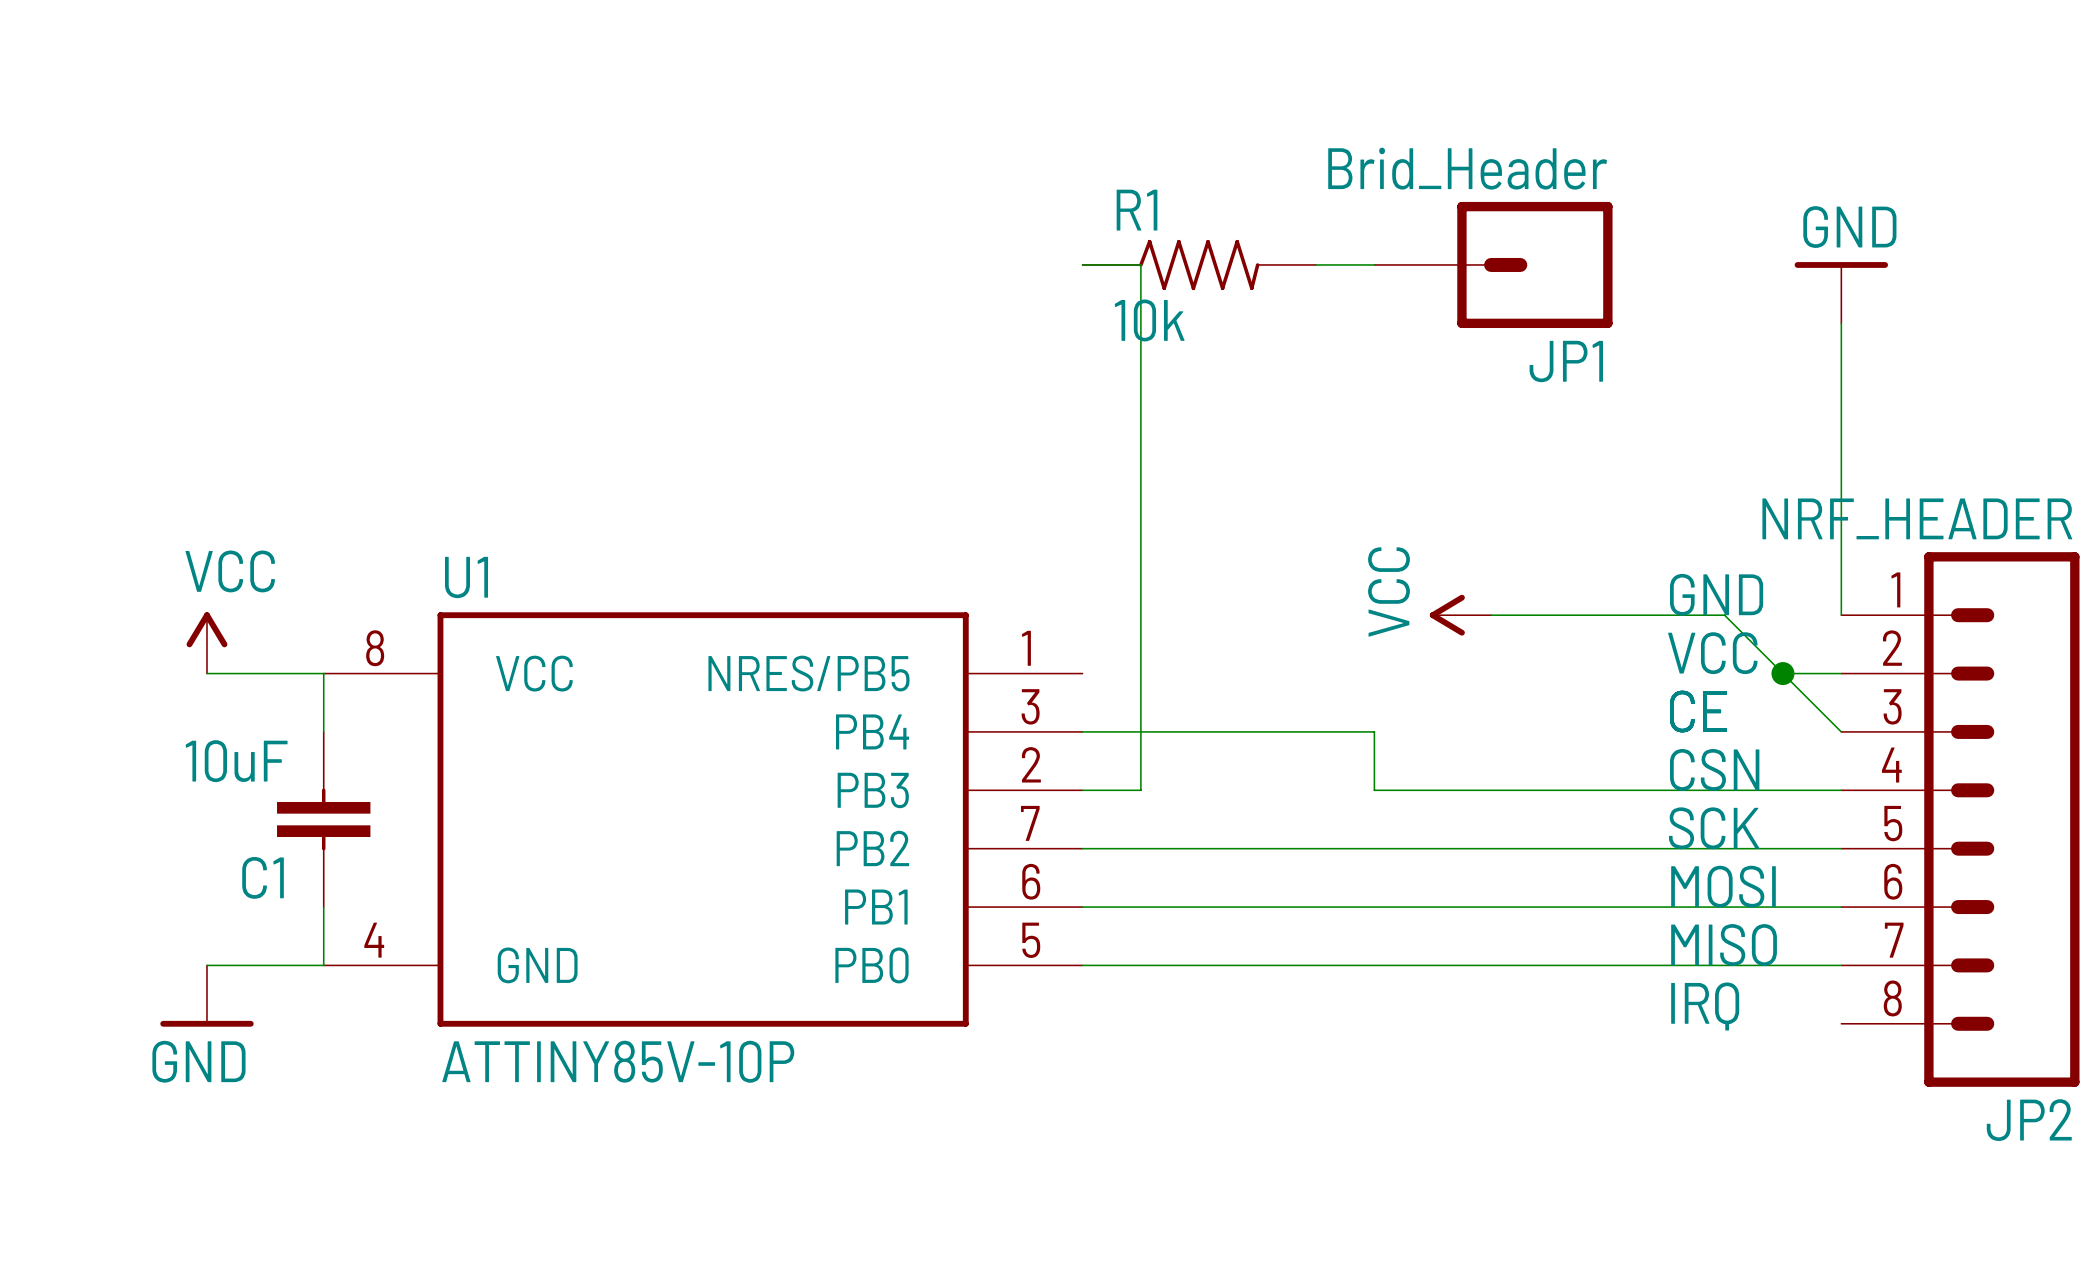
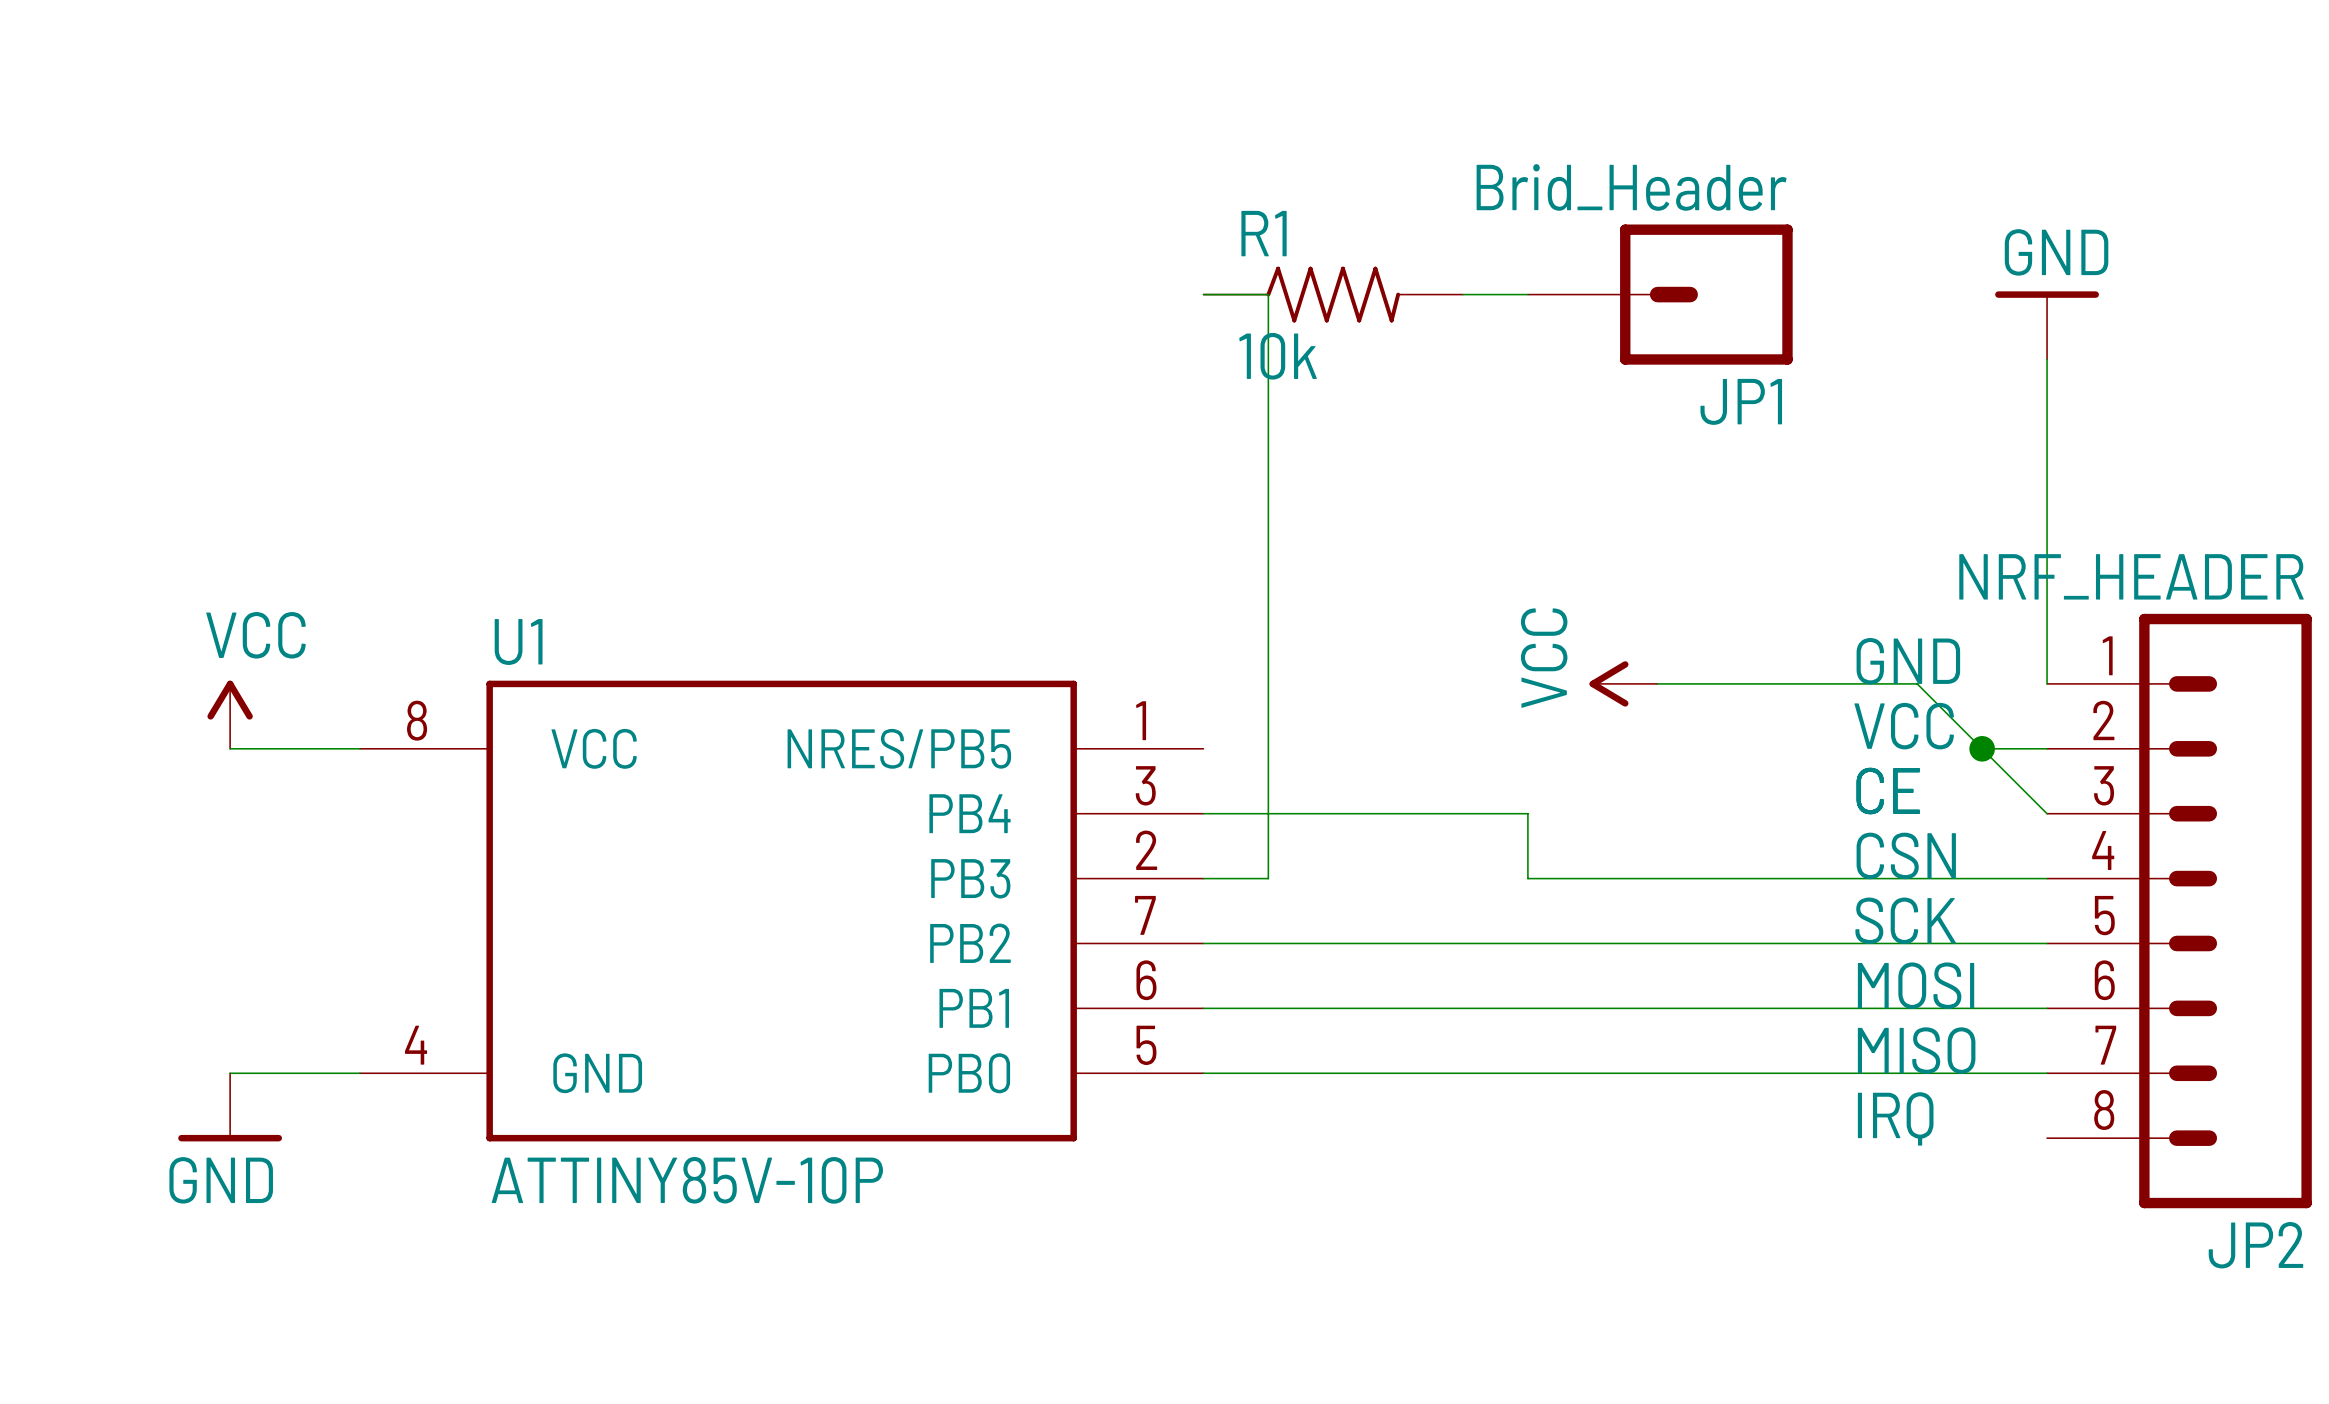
wire: (323, 673) (323, 731) -> none
C1: 10uF (323, 819) -> none
wire: (323, 907) (323, 965) -> none

